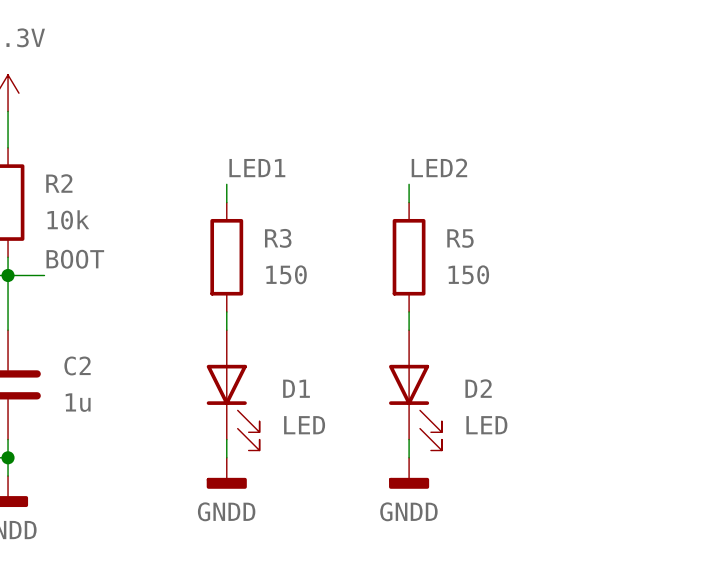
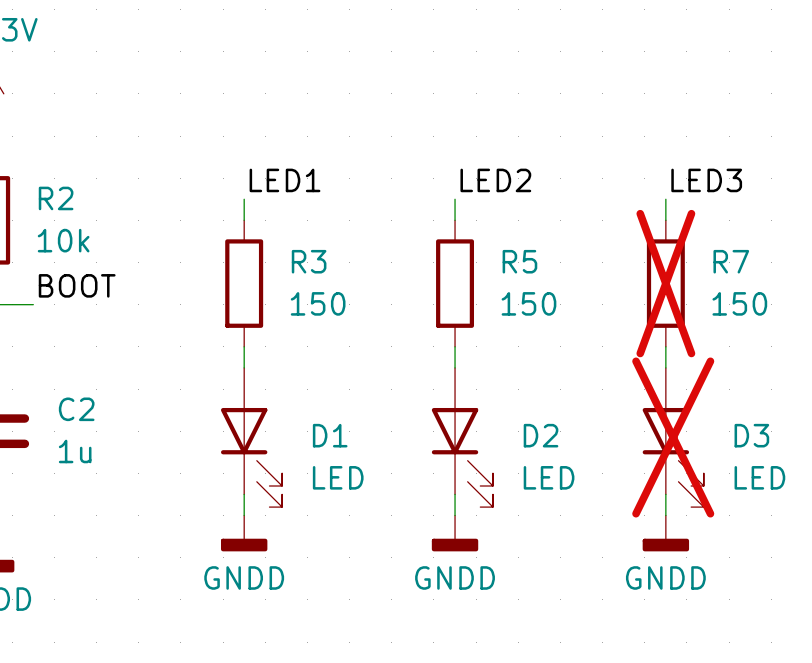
label: none -> LED3 (706, 180)
wire: none -> (665, 199) (665, 220)
R7: none -> 150 (665, 283)
wire: none -> (665, 346) (665, 367)
D3: none -> LED (673, 437)
wire: none -> (665, 494) (665, 515)
power symbol: none -> GNDD (665, 533)

